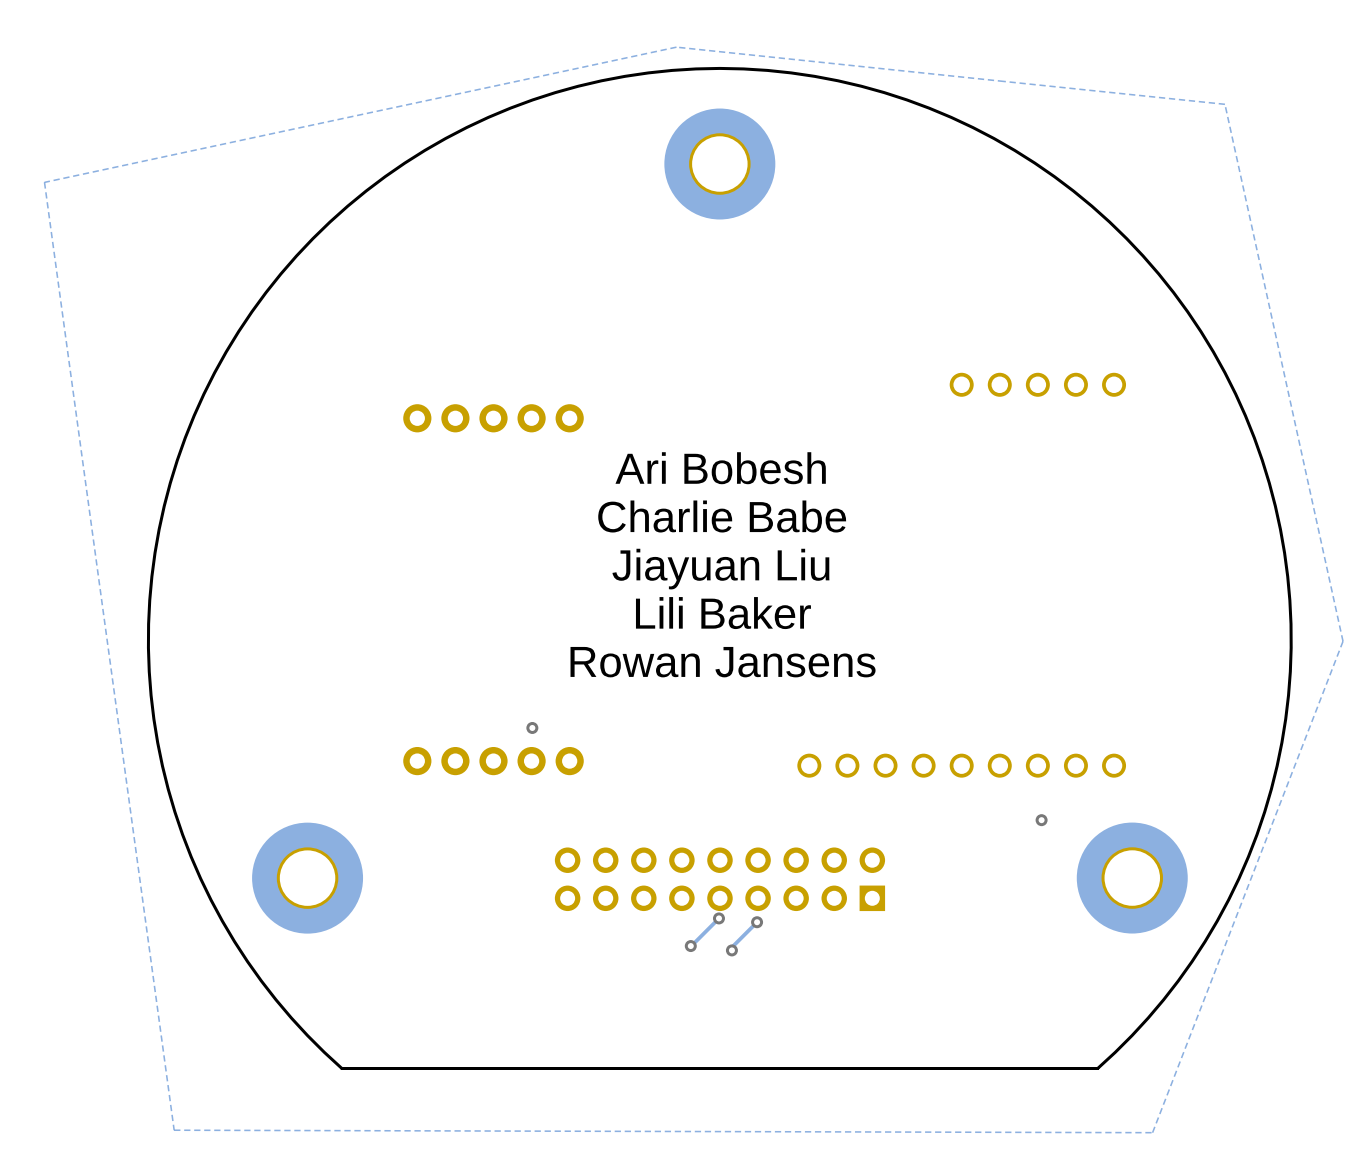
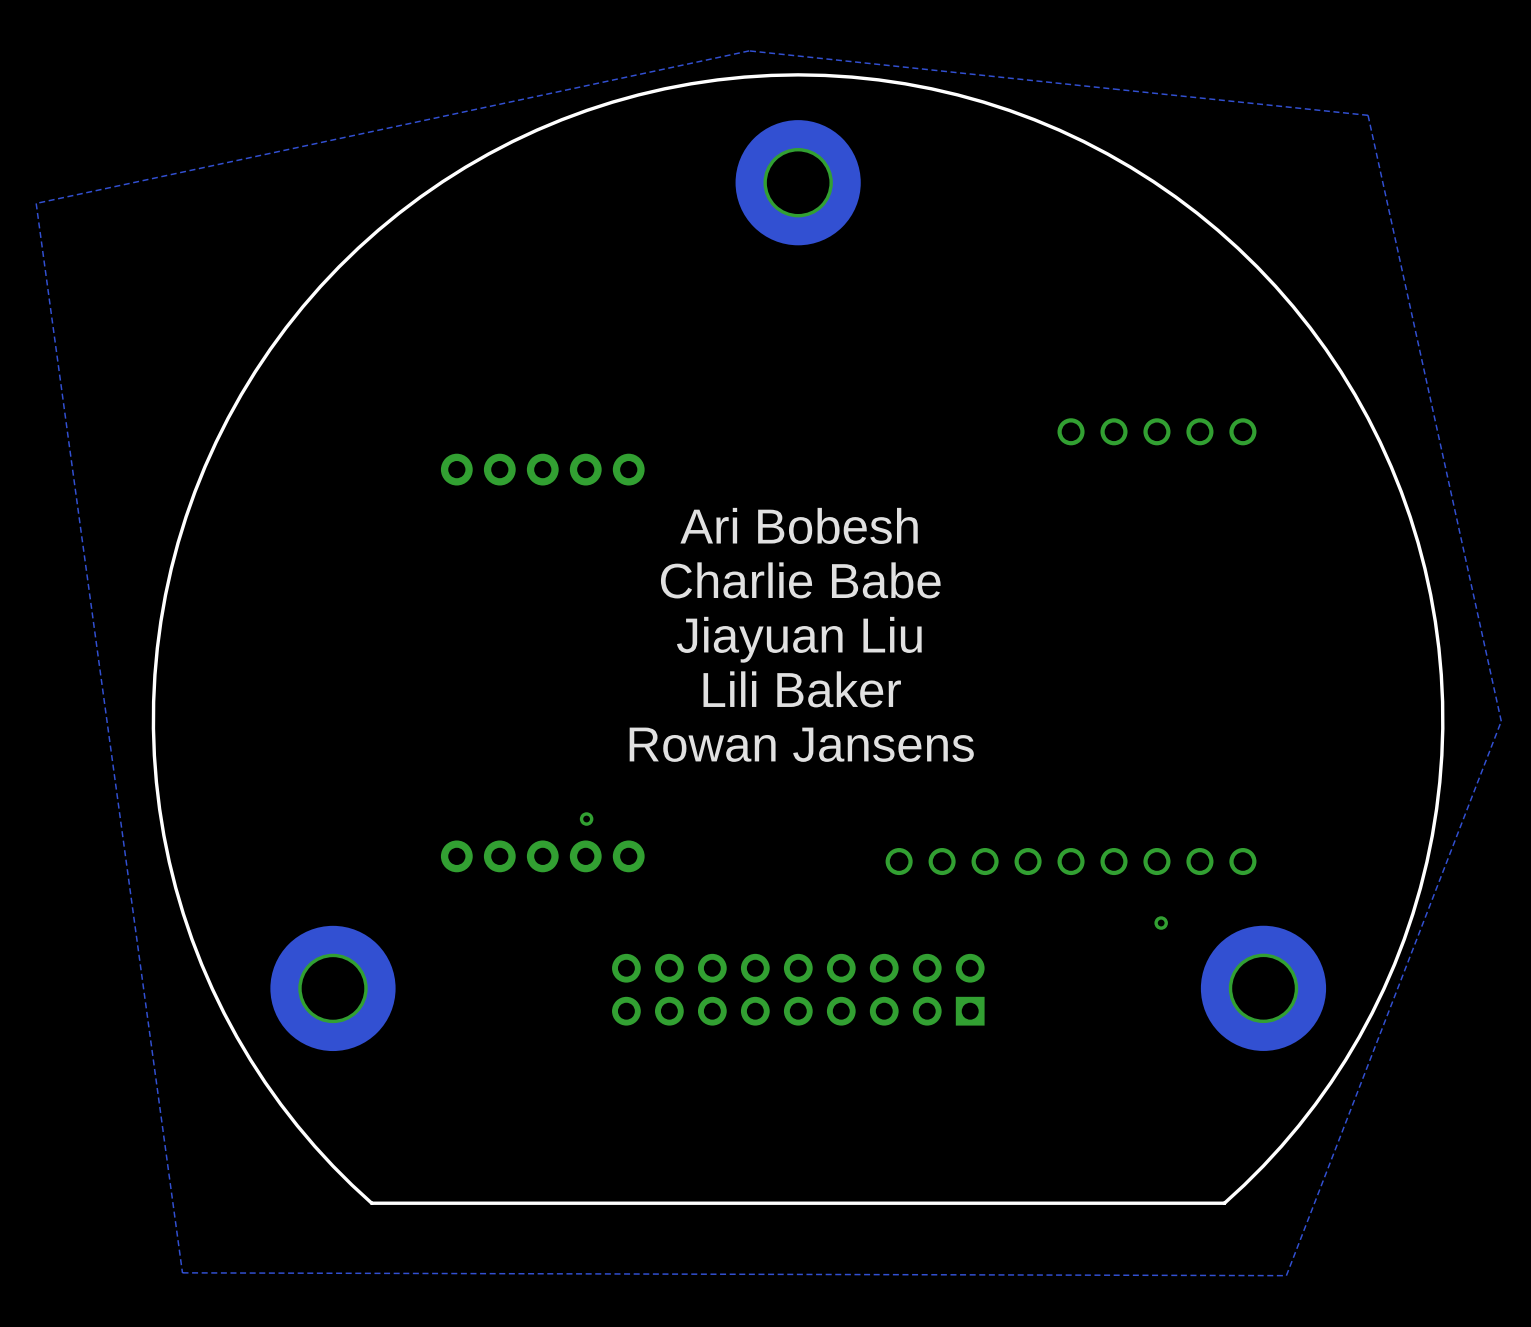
track: (718, 918) (690, 946) -> none
via: (718, 918) -> none
track: (757, 922) (731, 947) (731, 950) -> none
via: (757, 922) -> none
via: (690, 946) -> none
via: (731, 950) -> none

